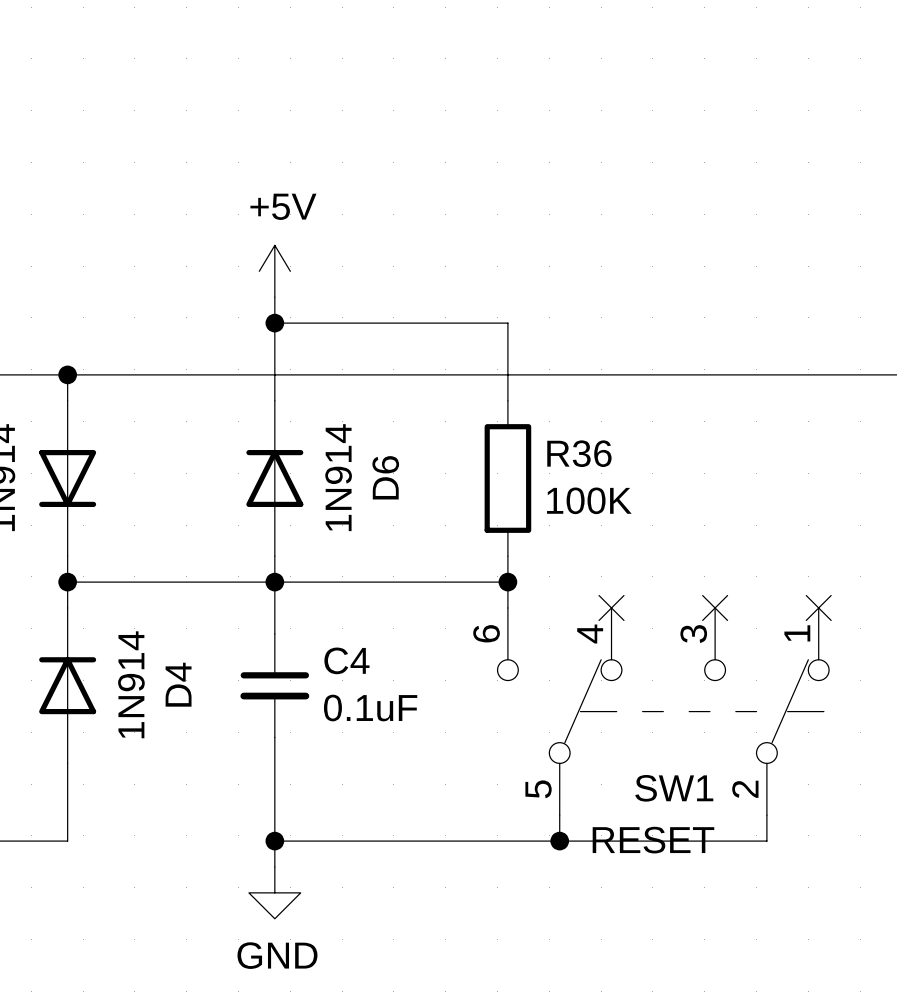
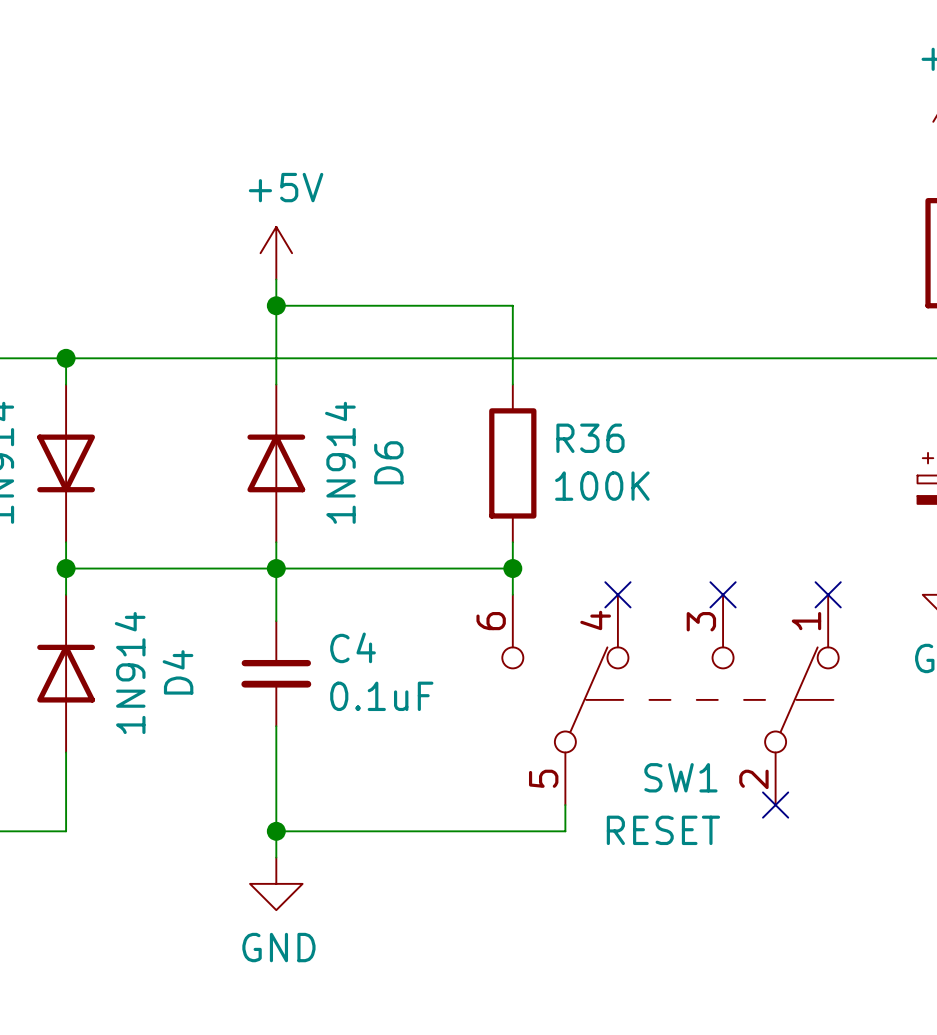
wire: (766, 815) (766, 841) (559, 841) -> none
no-connect mark: none -> (775, 805)
junction: (559, 841) -> none

